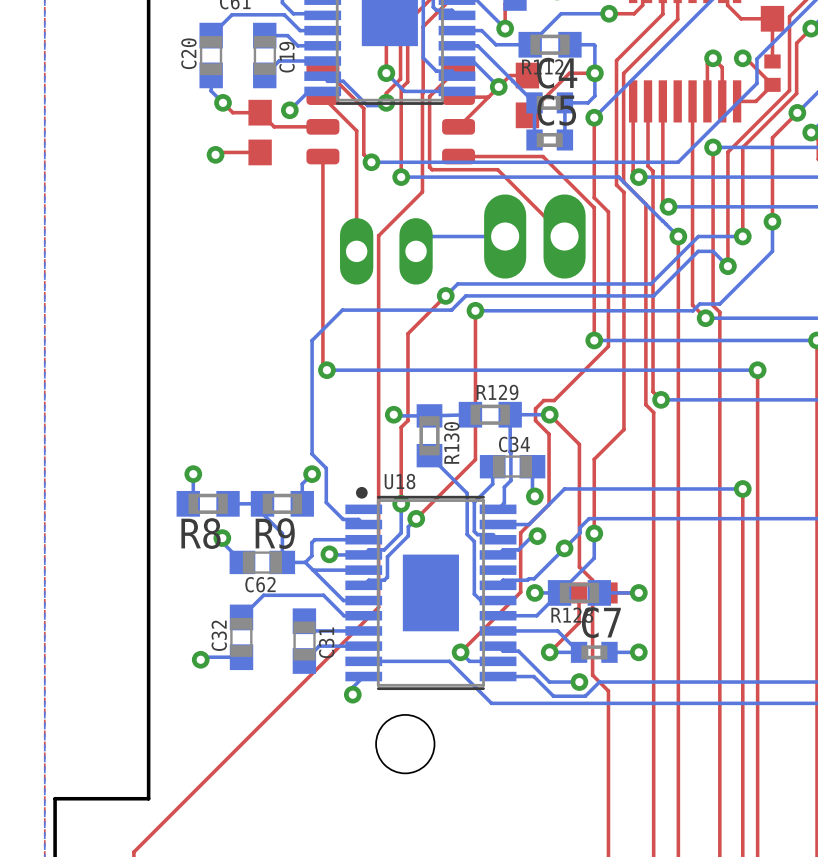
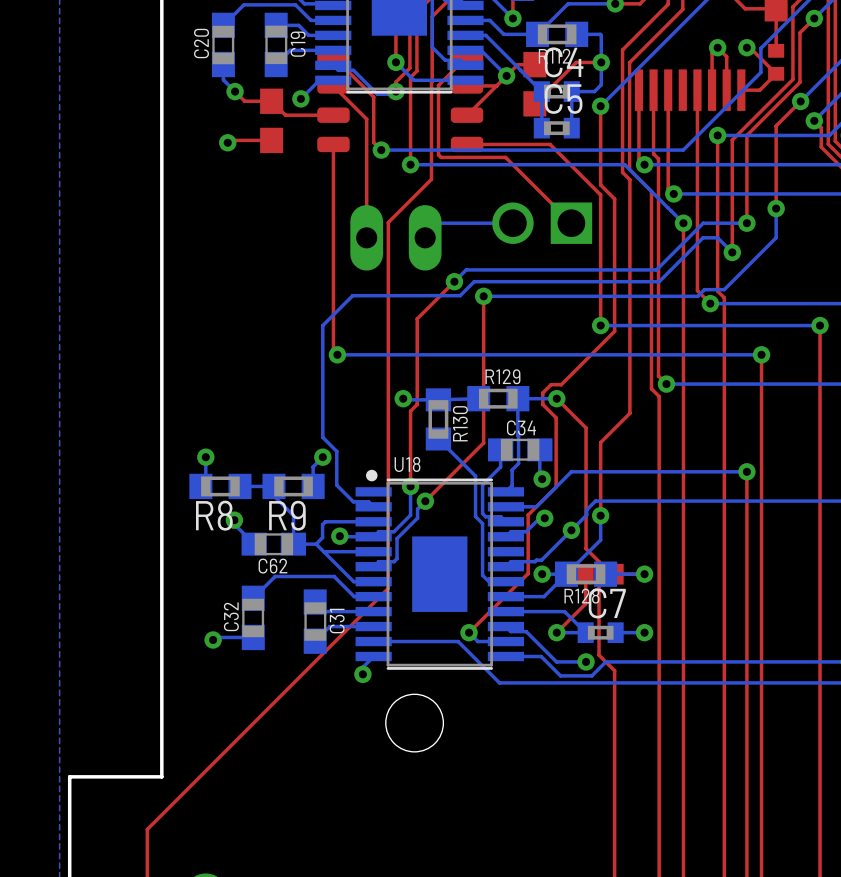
part footprint: [484, 194, 586, 279] -> [492, 202, 593, 244]

